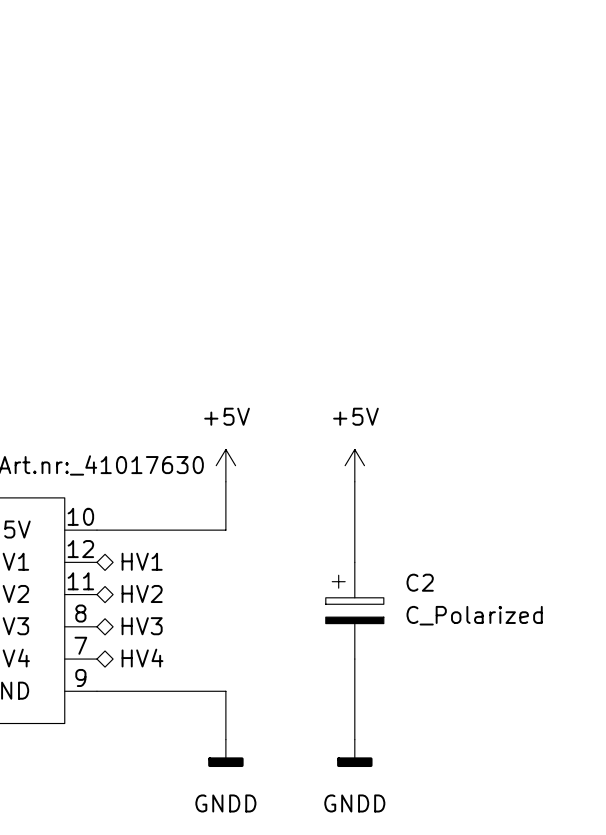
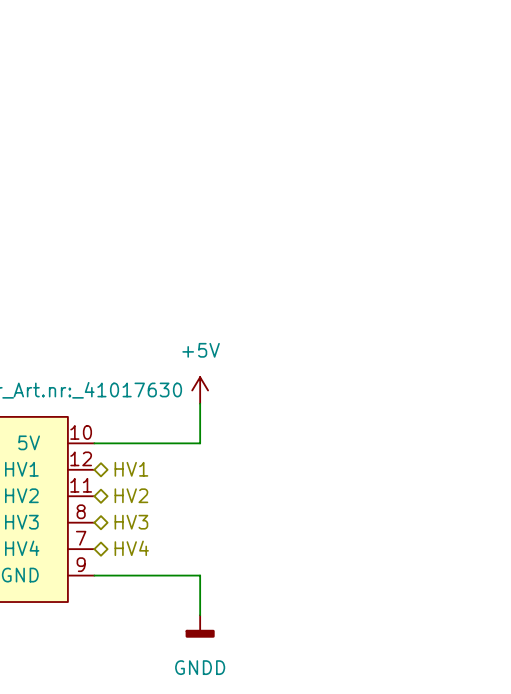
power symbol: +5V (354, 465) -> none
wire: (354, 481) (354, 562) -> none
C2: C_Polarized (354, 610) -> none
wire: (354, 659) (354, 739) -> none
power symbol: GNDD (354, 753) -> none

